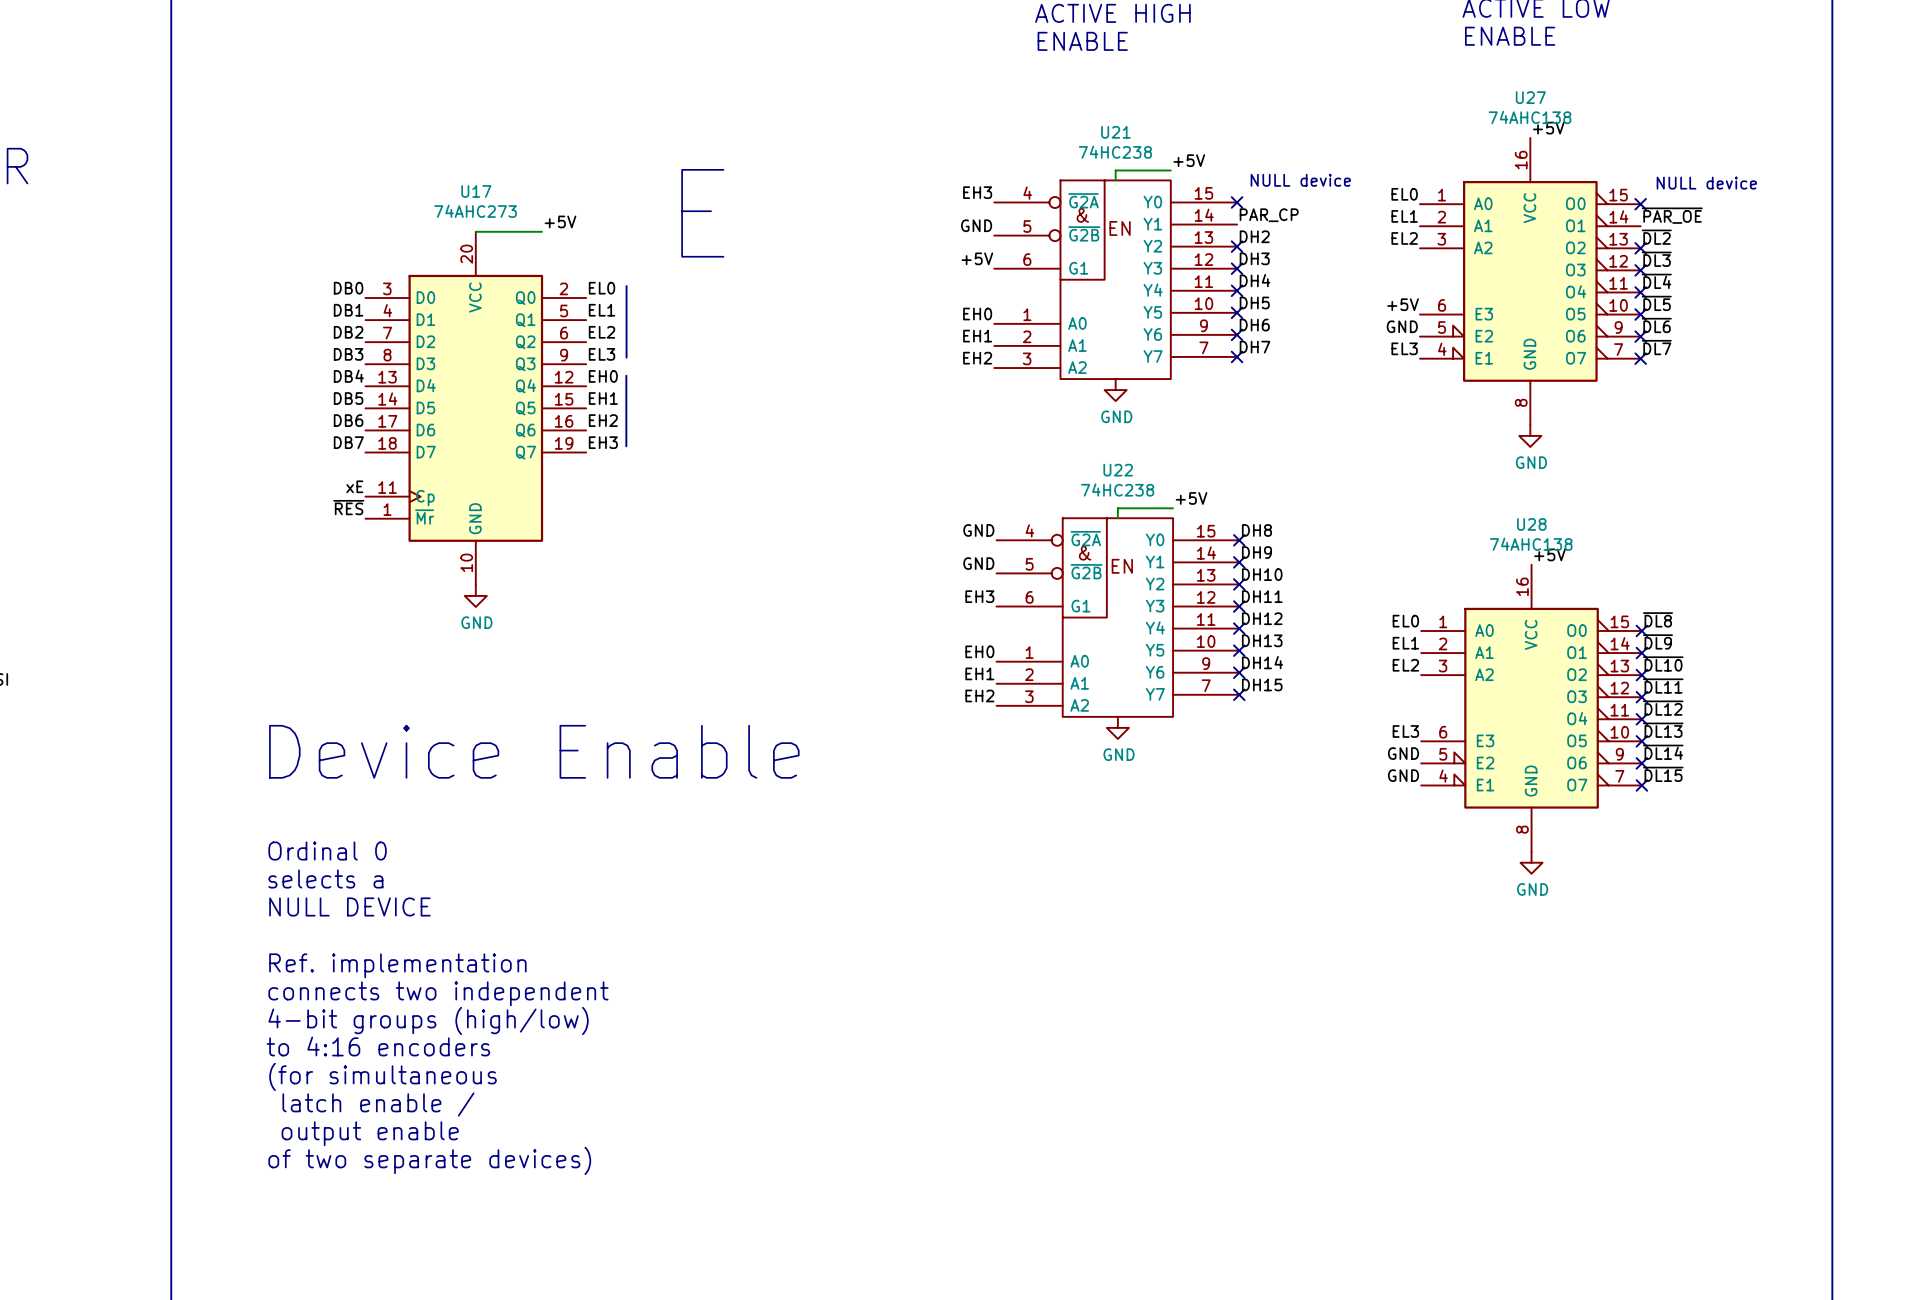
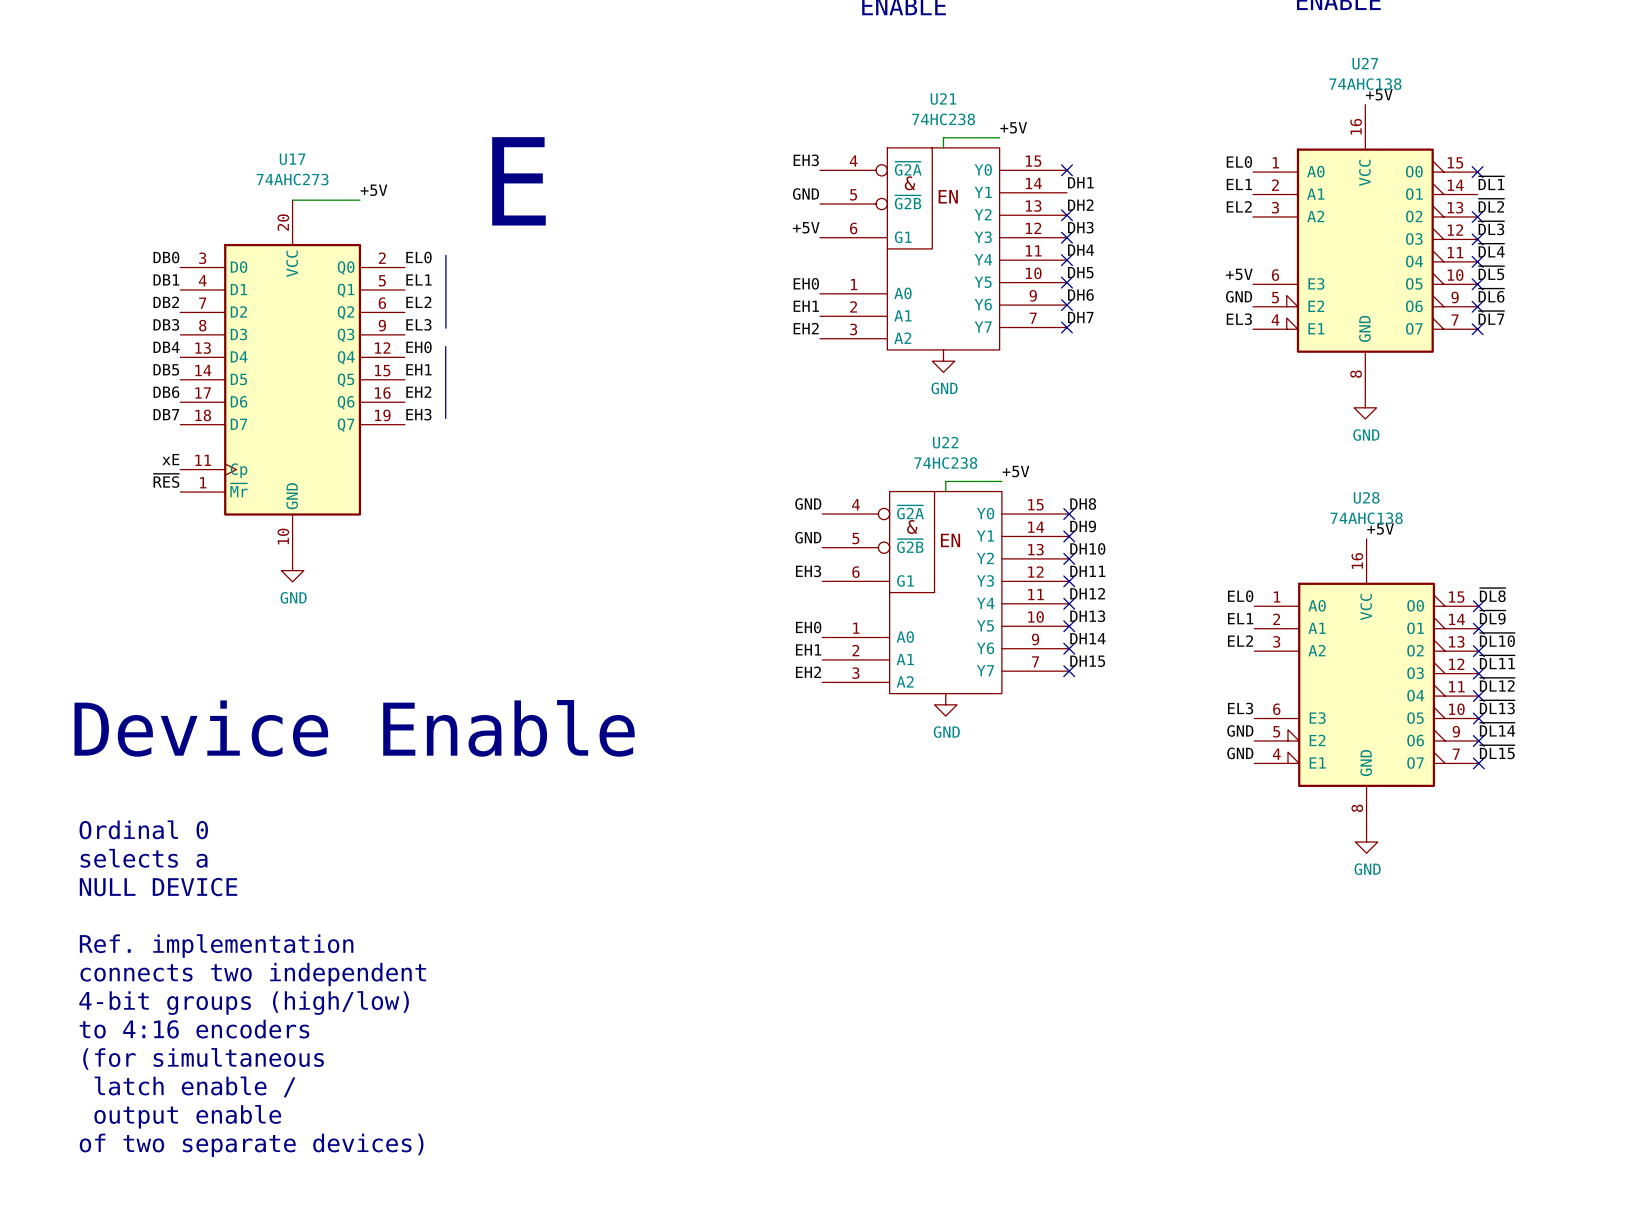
text: NULL device (1300, 180) -> none
text: NULL device (1706, 183) -> none
label: PAR_CP (1269, 215) -> DH1 (1080, 182)
label: ~{PAR_OE} (1672, 215) -> ~{DL1} (1491, 183)

